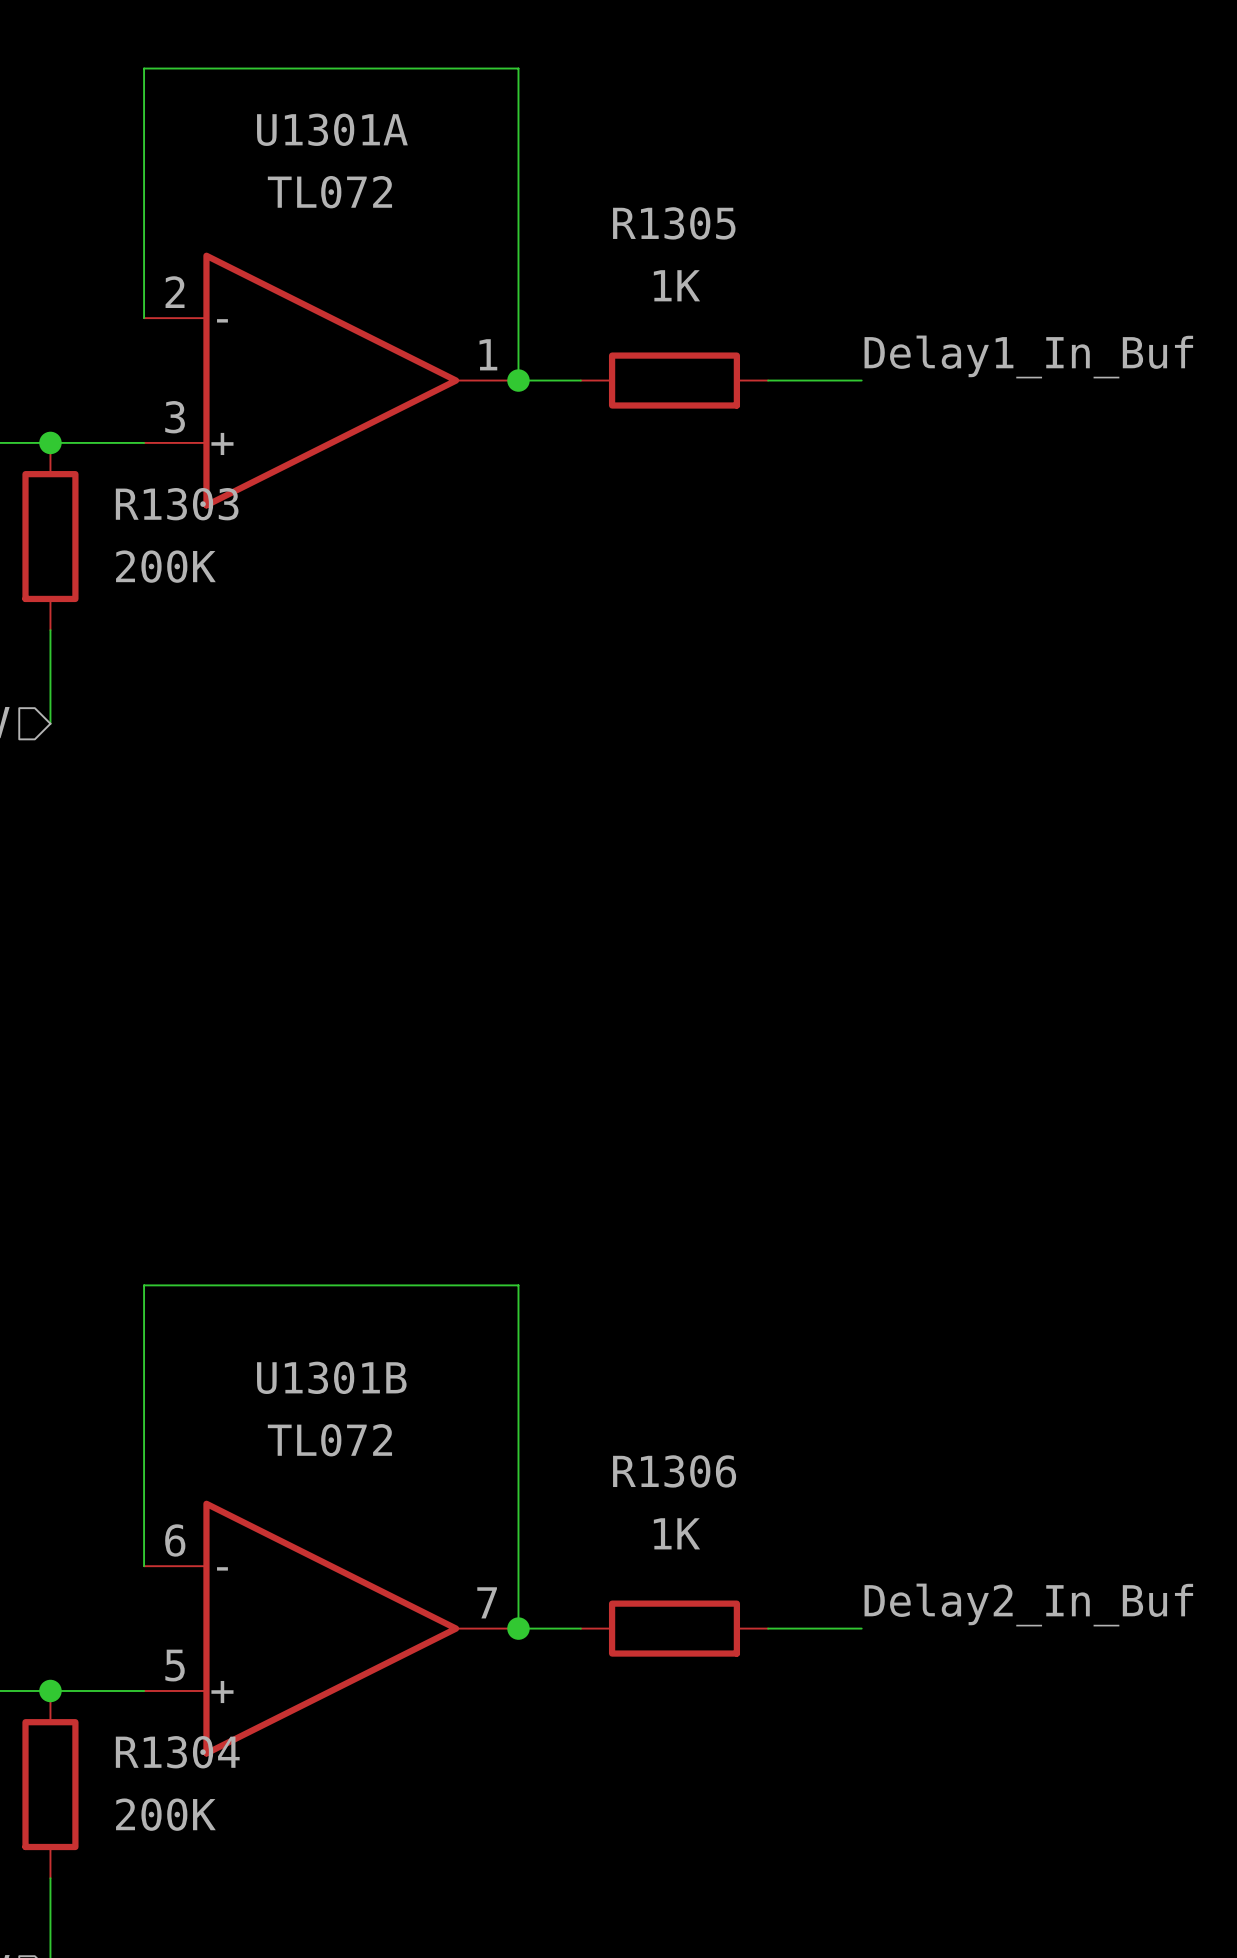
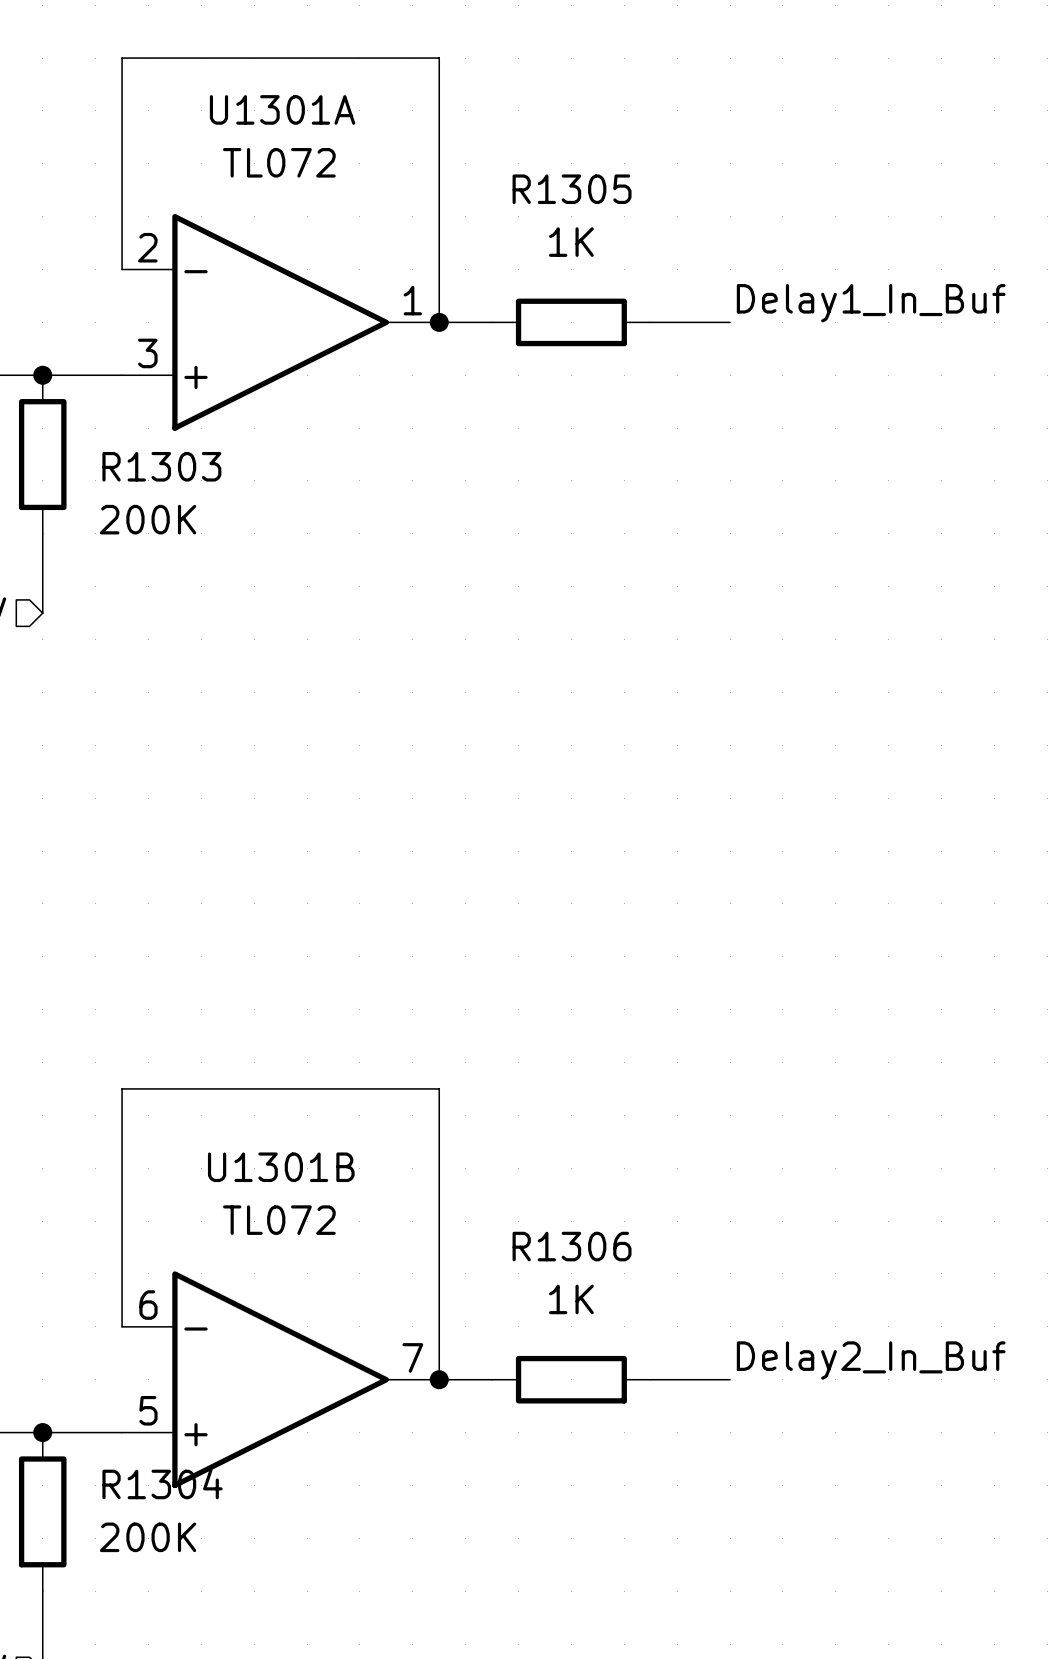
R1303 name position: R1303 (177, 504) -> R1303 (161, 466)
R1303 value position: 200K (165, 566) -> 200K (148, 519)

